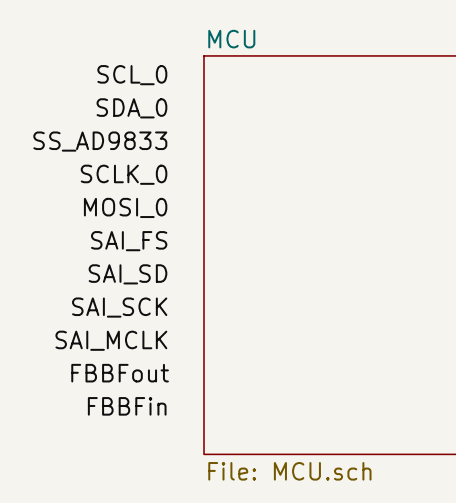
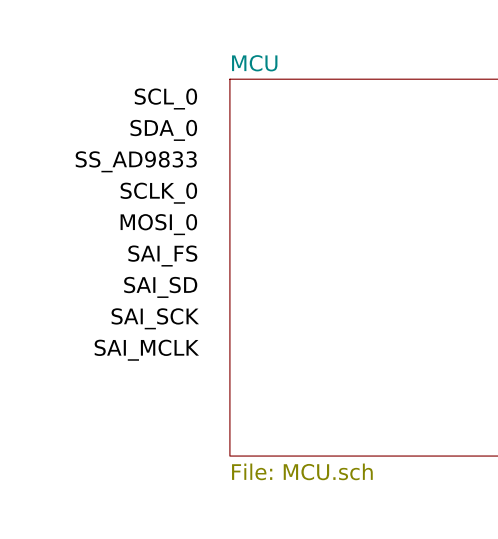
label: FBBFout (120, 373) -> none
label: FBBFin (127, 406) -> none

